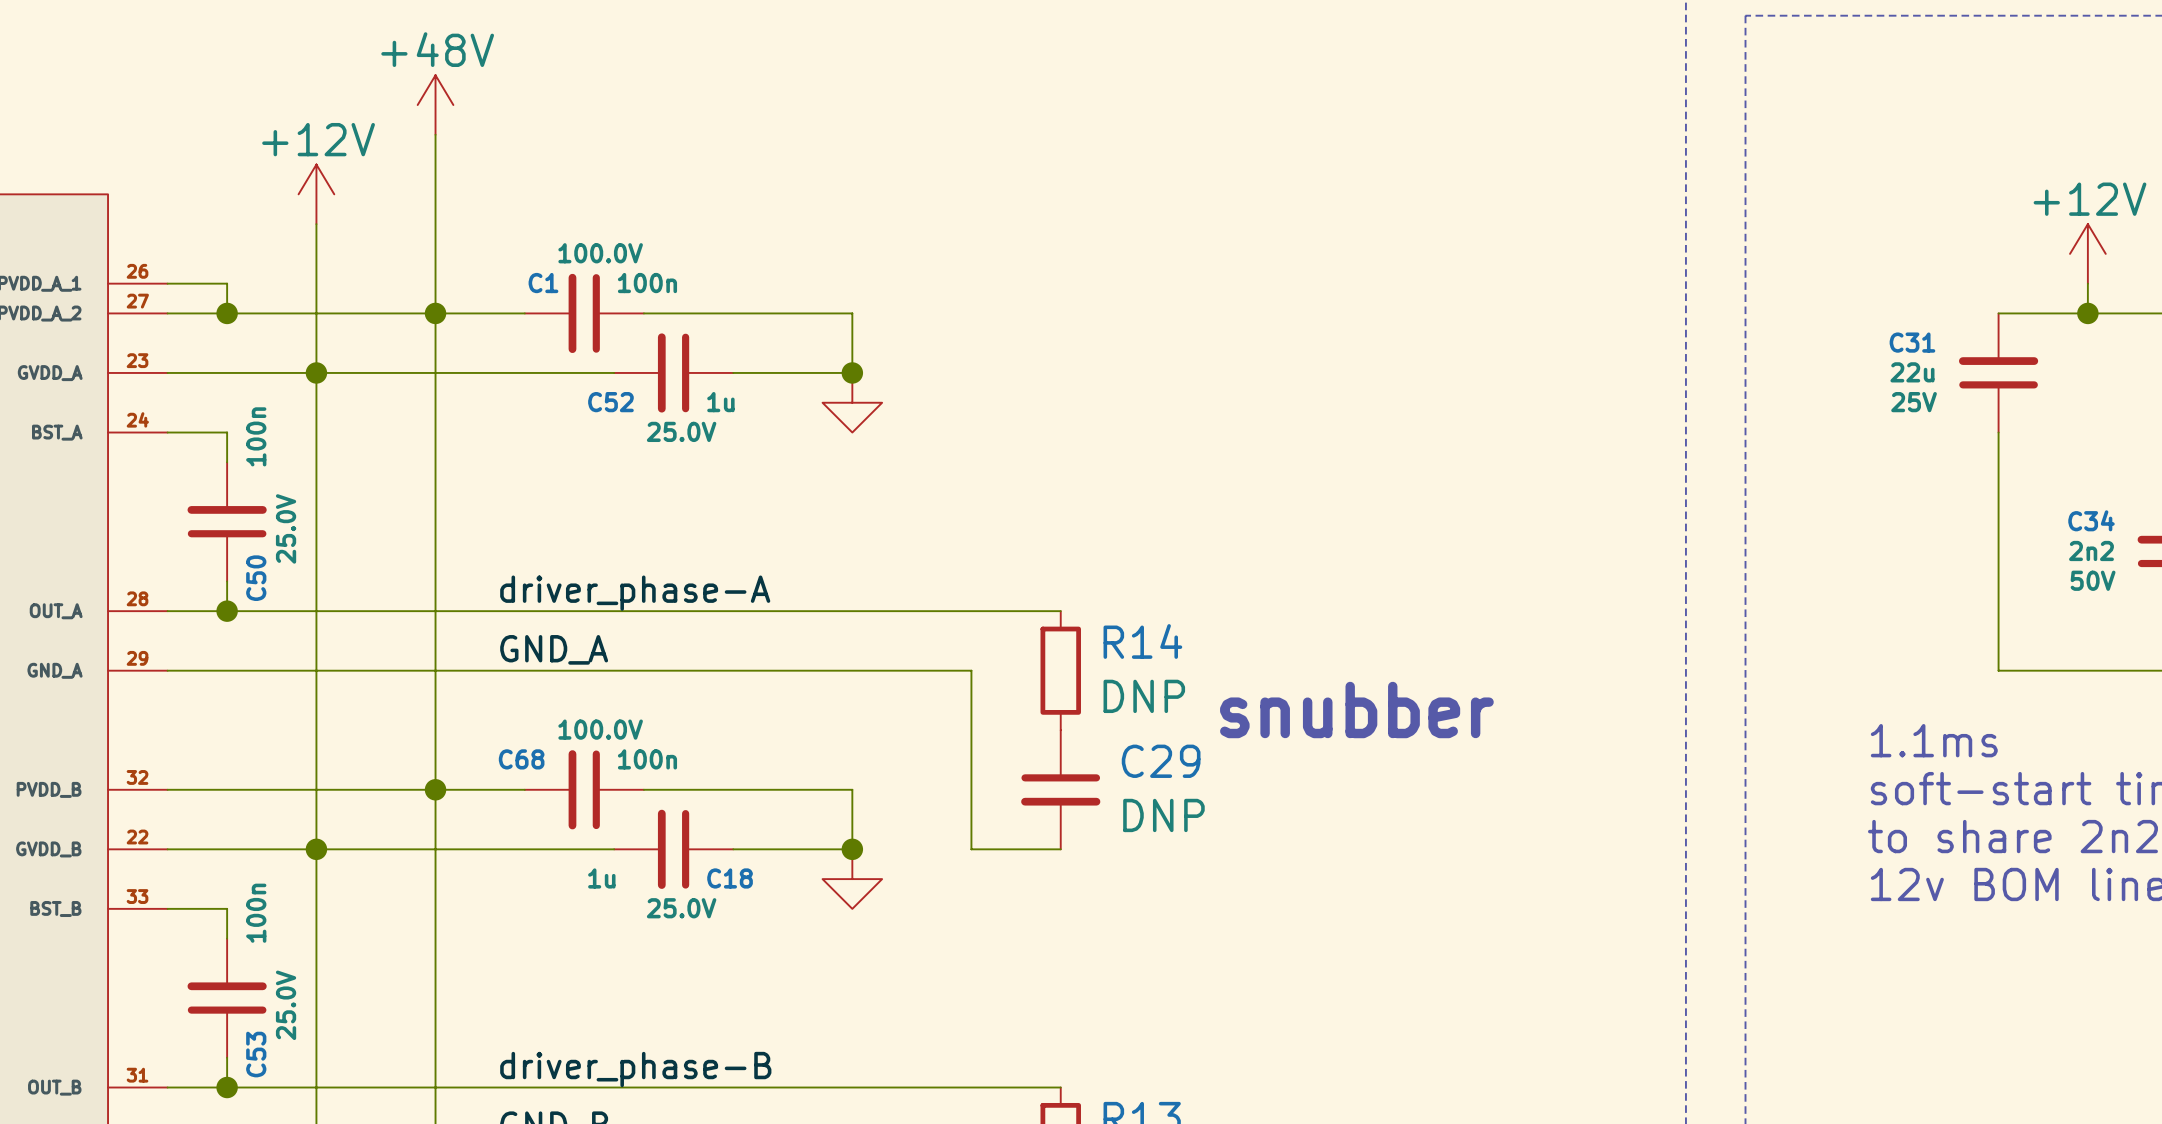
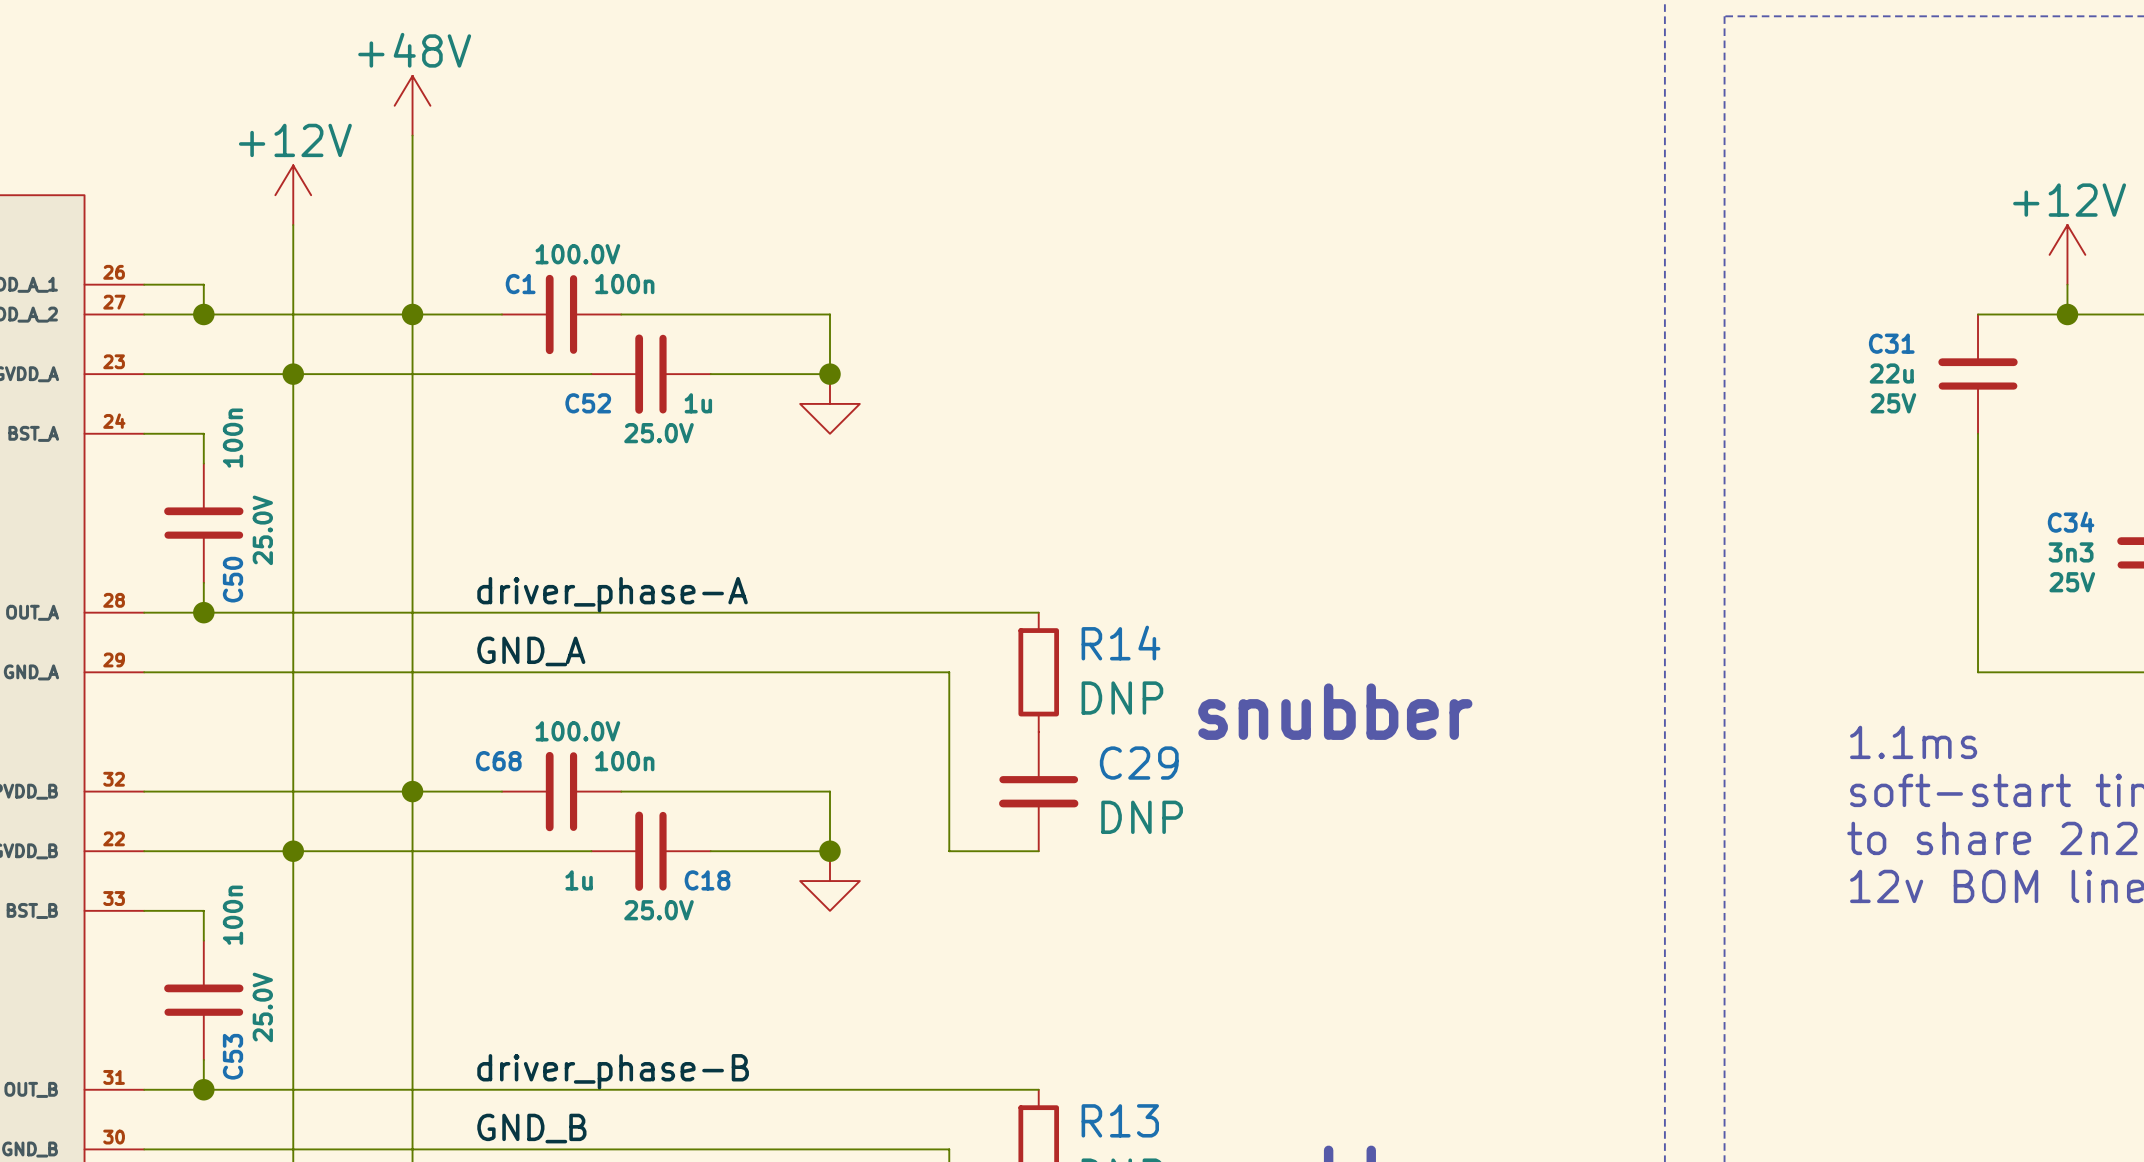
C34 value: 2n2 (2091, 550) -> 3n3 (2071, 552)
C34 text: 50V (2093, 580) -> 25V (2072, 582)

